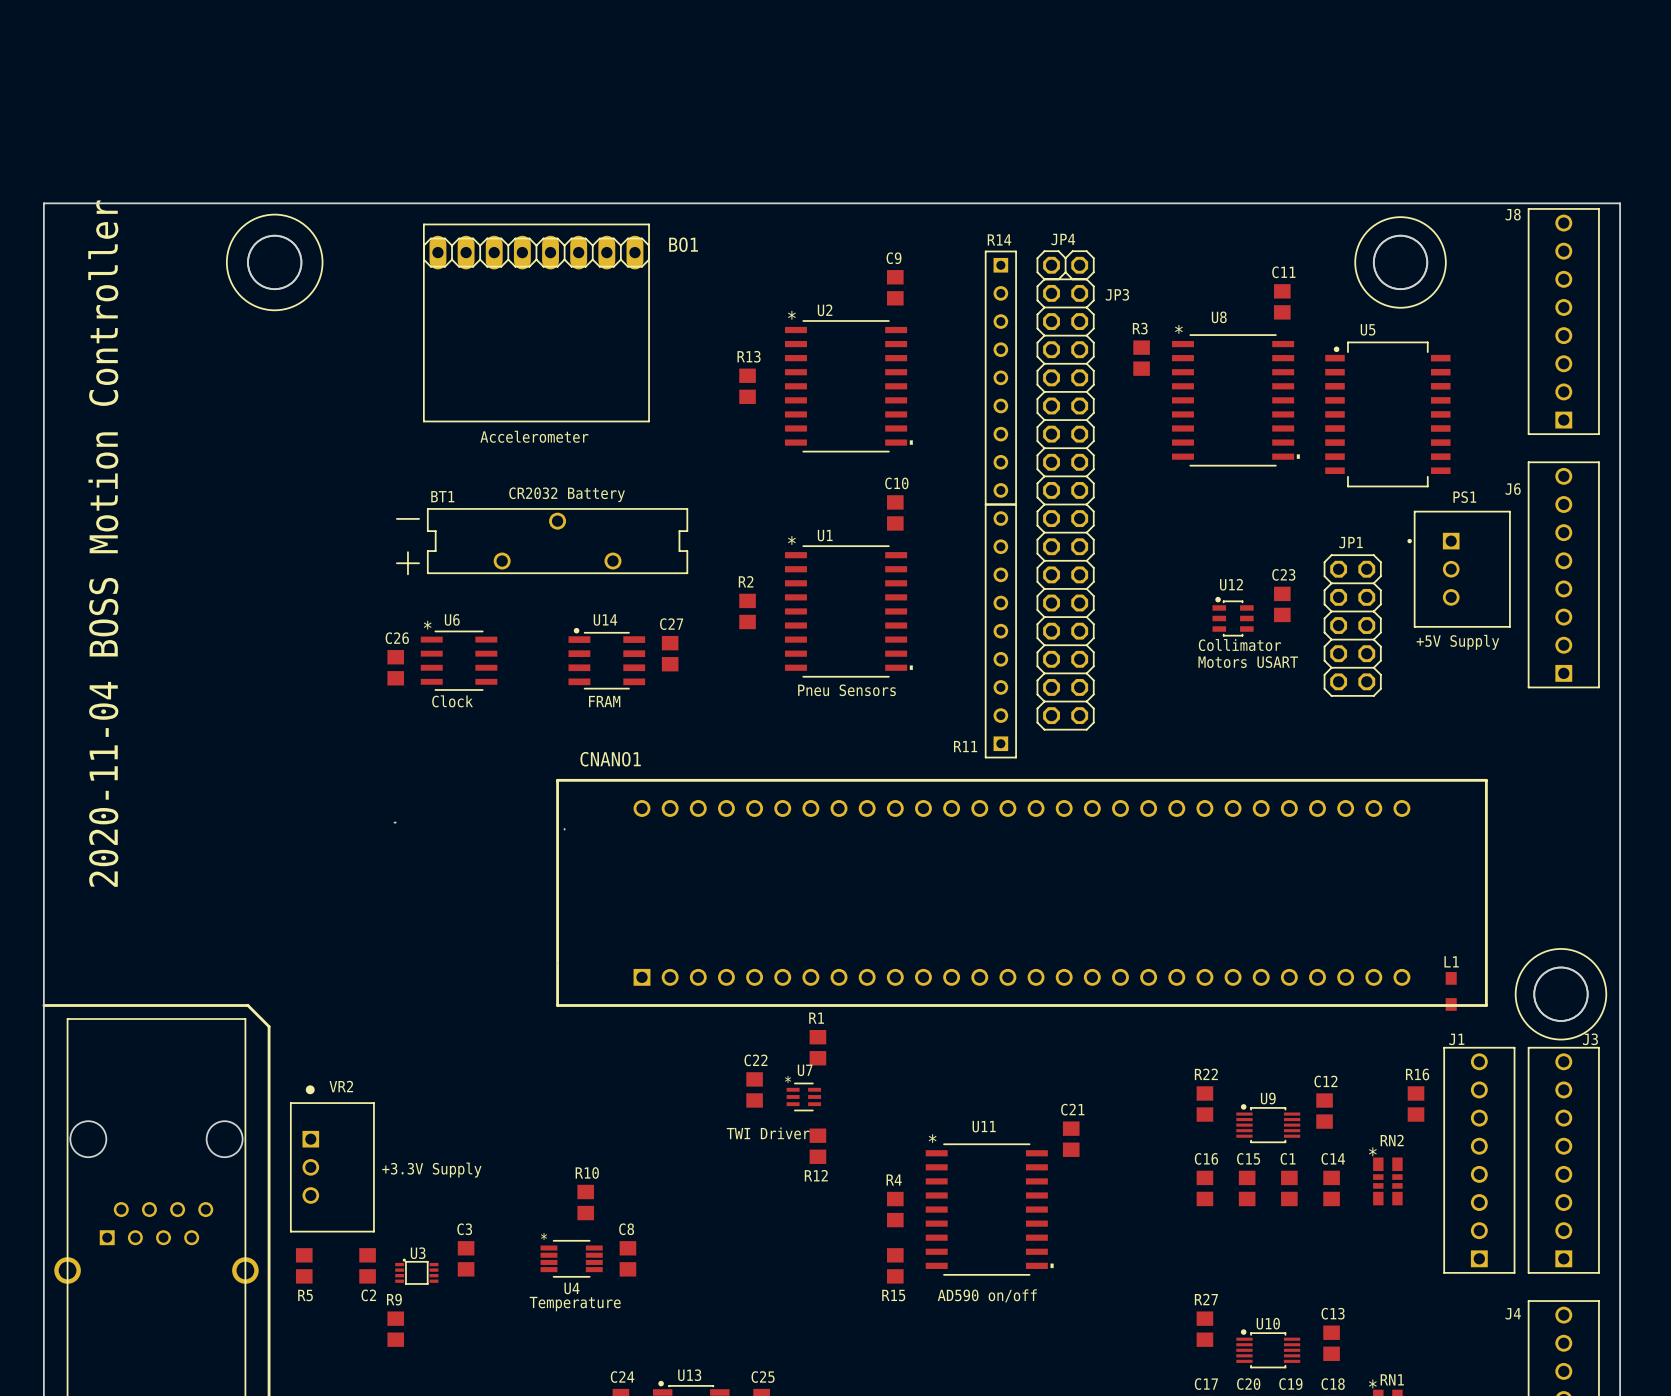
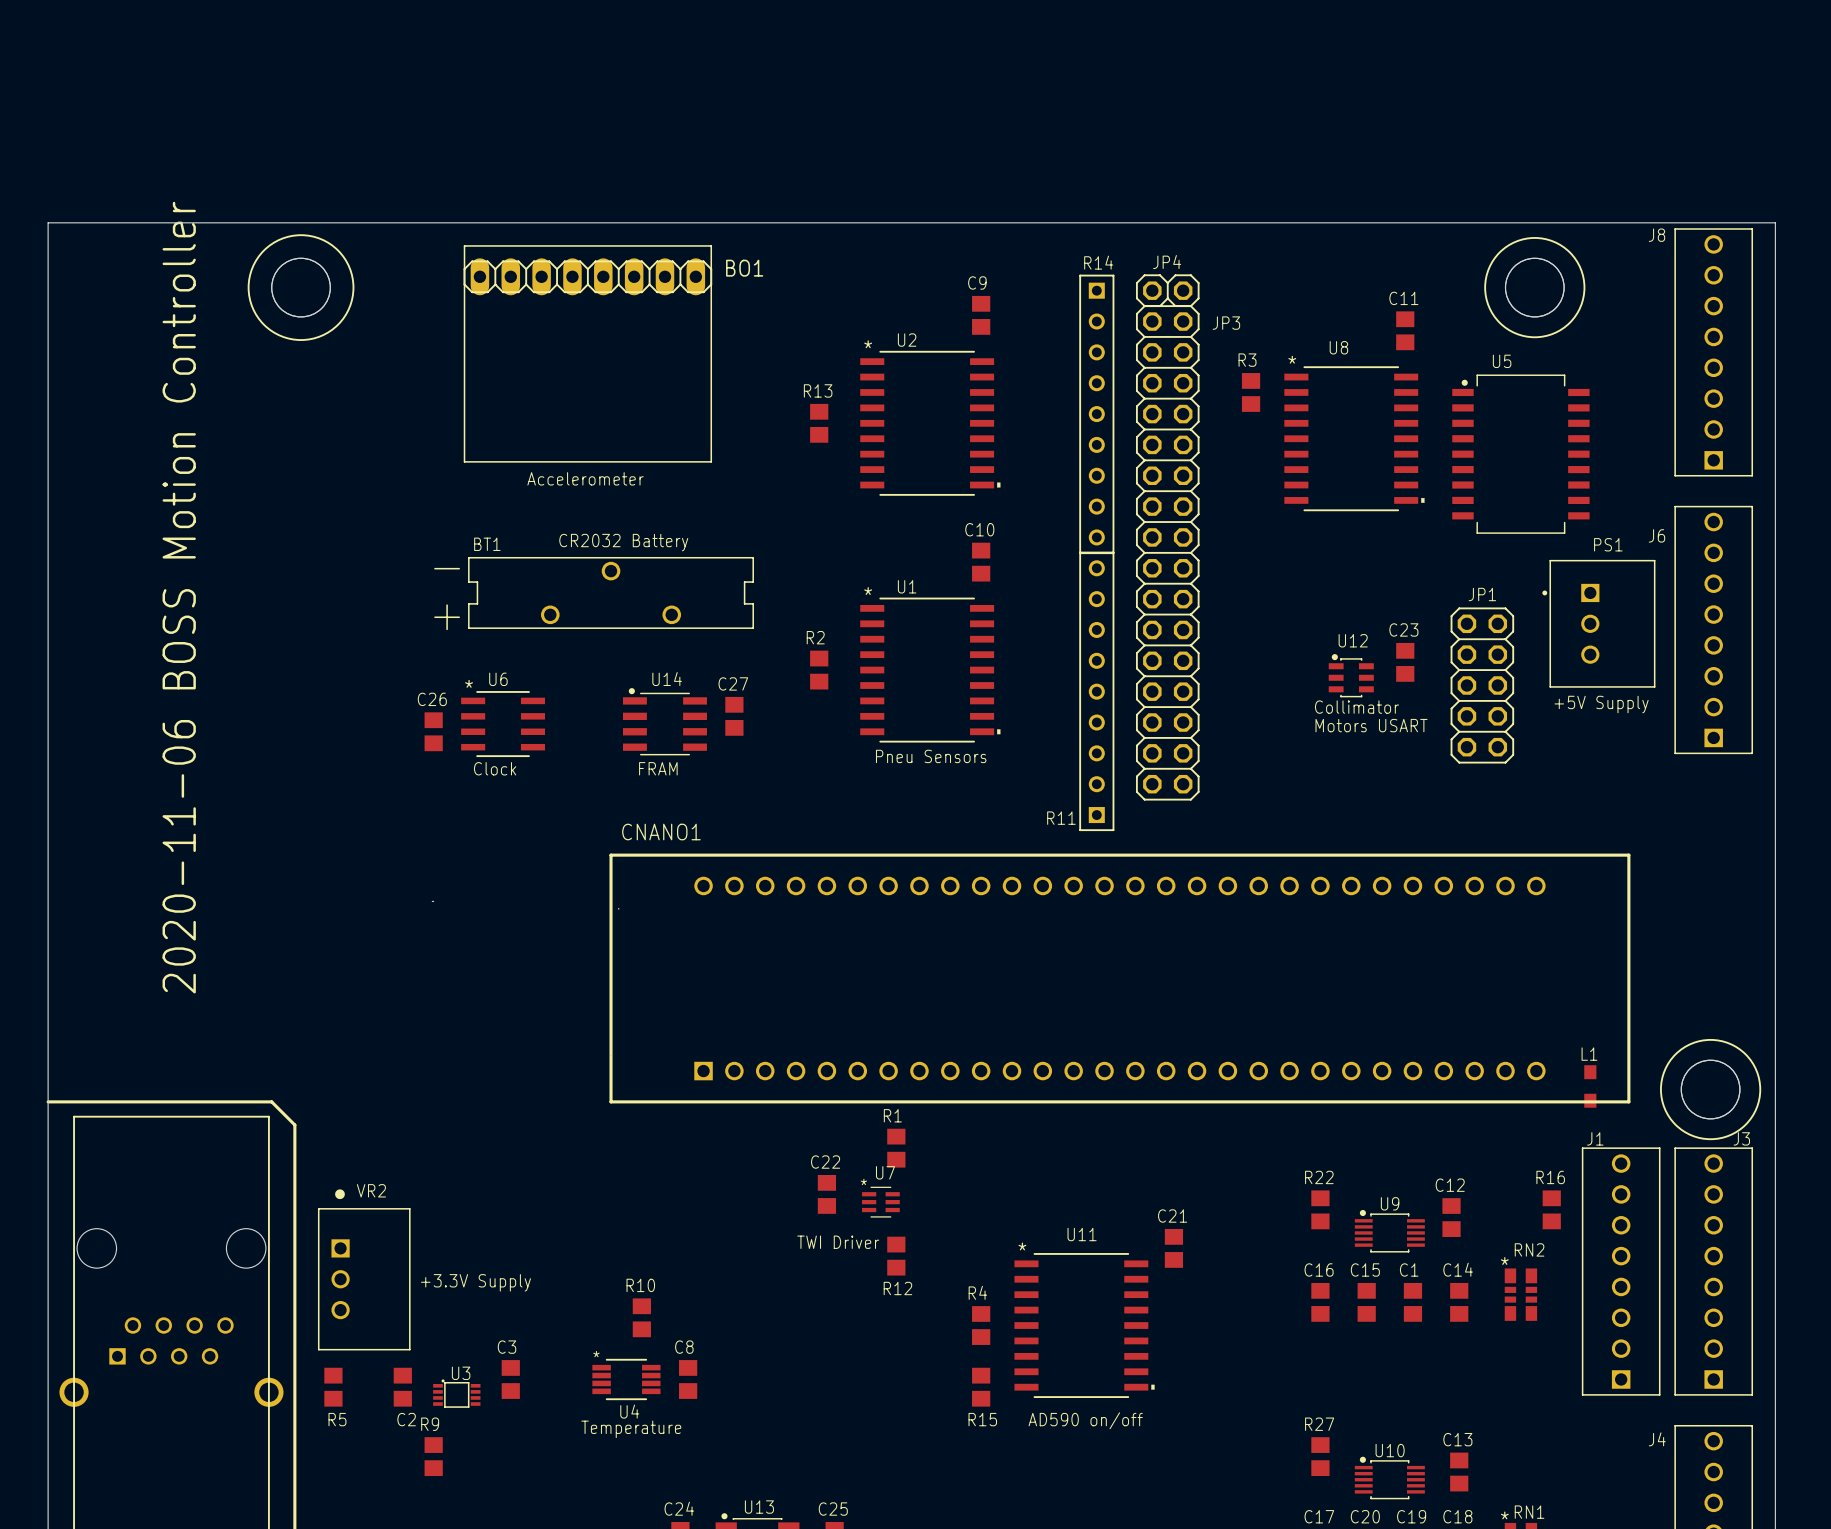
text: 2020-11-04 BOSS Motion Controller (103, 543) -> none
text: none -> 2020-11-06 BOSS Motion Controller (179, 597)

